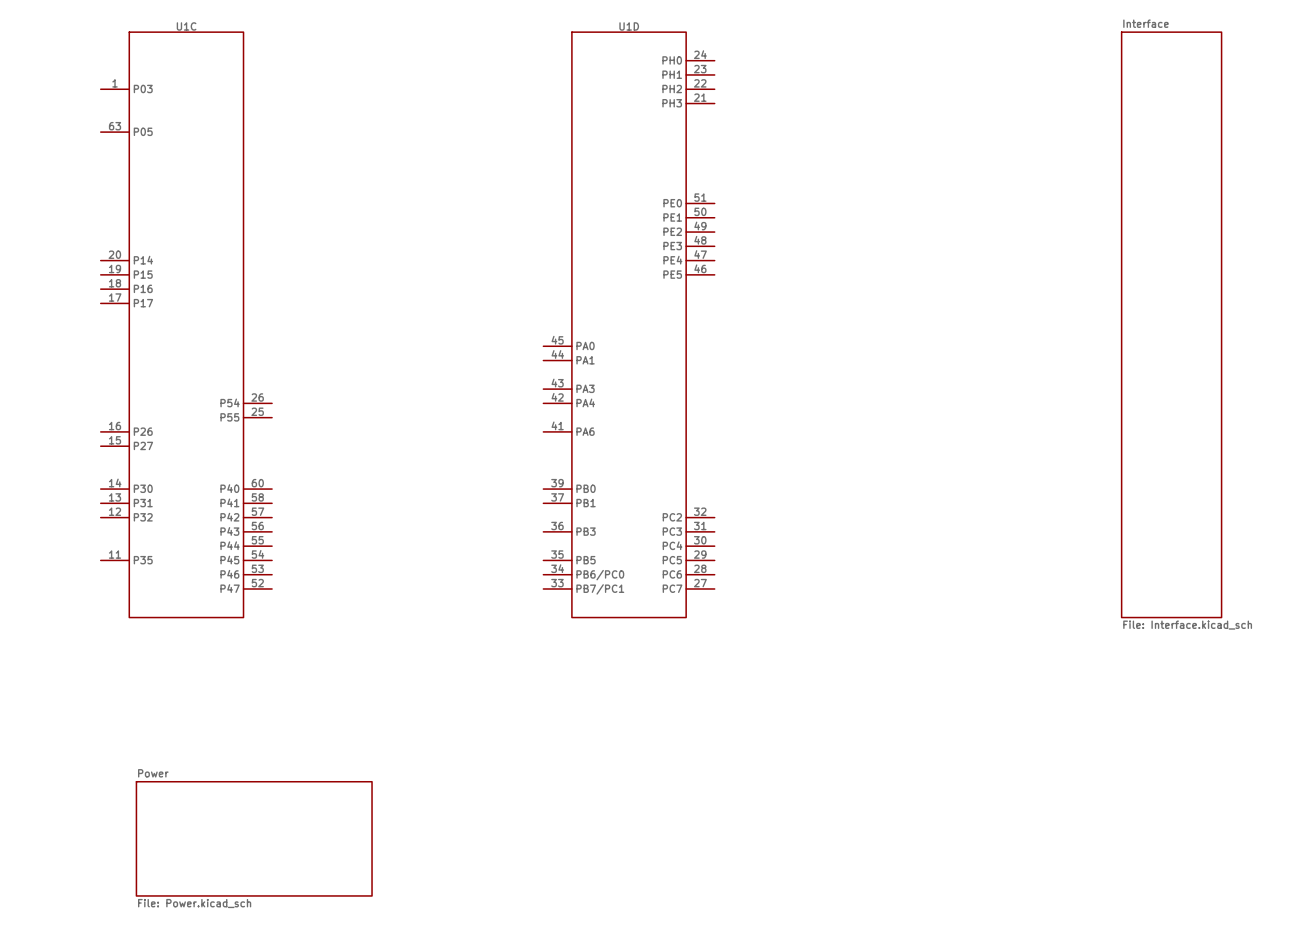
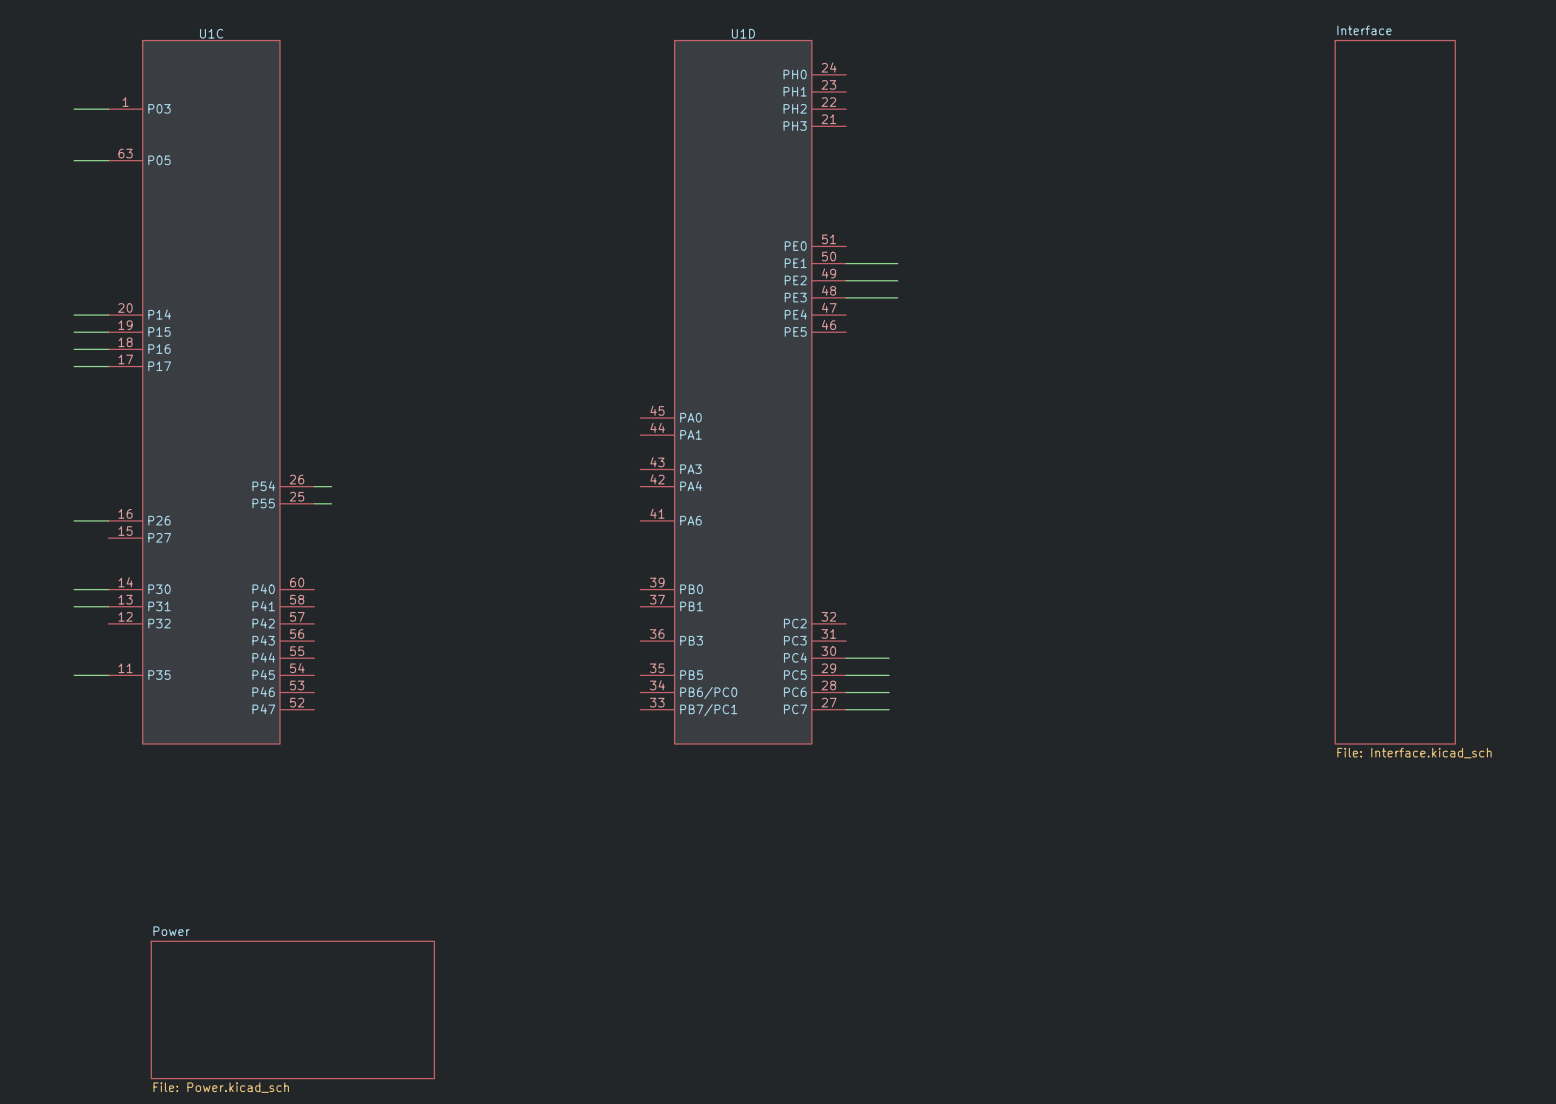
wire: none -> (74, 109) (108, 109)
wire: none -> (74, 160) (108, 160)
wire: none -> (846, 263) (897, 263)
wire: none -> (846, 280) (897, 280)
wire: none -> (846, 297) (897, 297)
wire: none -> (74, 315) (108, 315)
wire: none -> (74, 332) (108, 332)
wire: none -> (74, 349) (108, 349)
wire: none -> (74, 366) (108, 366)
wire: none -> (314, 486) (331, 486)
wire: none -> (314, 503) (331, 503)
wire: none -> (74, 520) (108, 520)
wire: none -> (74, 589) (108, 589)
wire: none -> (74, 606) (108, 606)
wire: none -> (846, 658) (889, 658)
wire: none -> (74, 675) (108, 675)
wire: none -> (846, 675) (889, 675)
wire: none -> (846, 692) (889, 692)
wire: none -> (846, 709) (889, 709)

